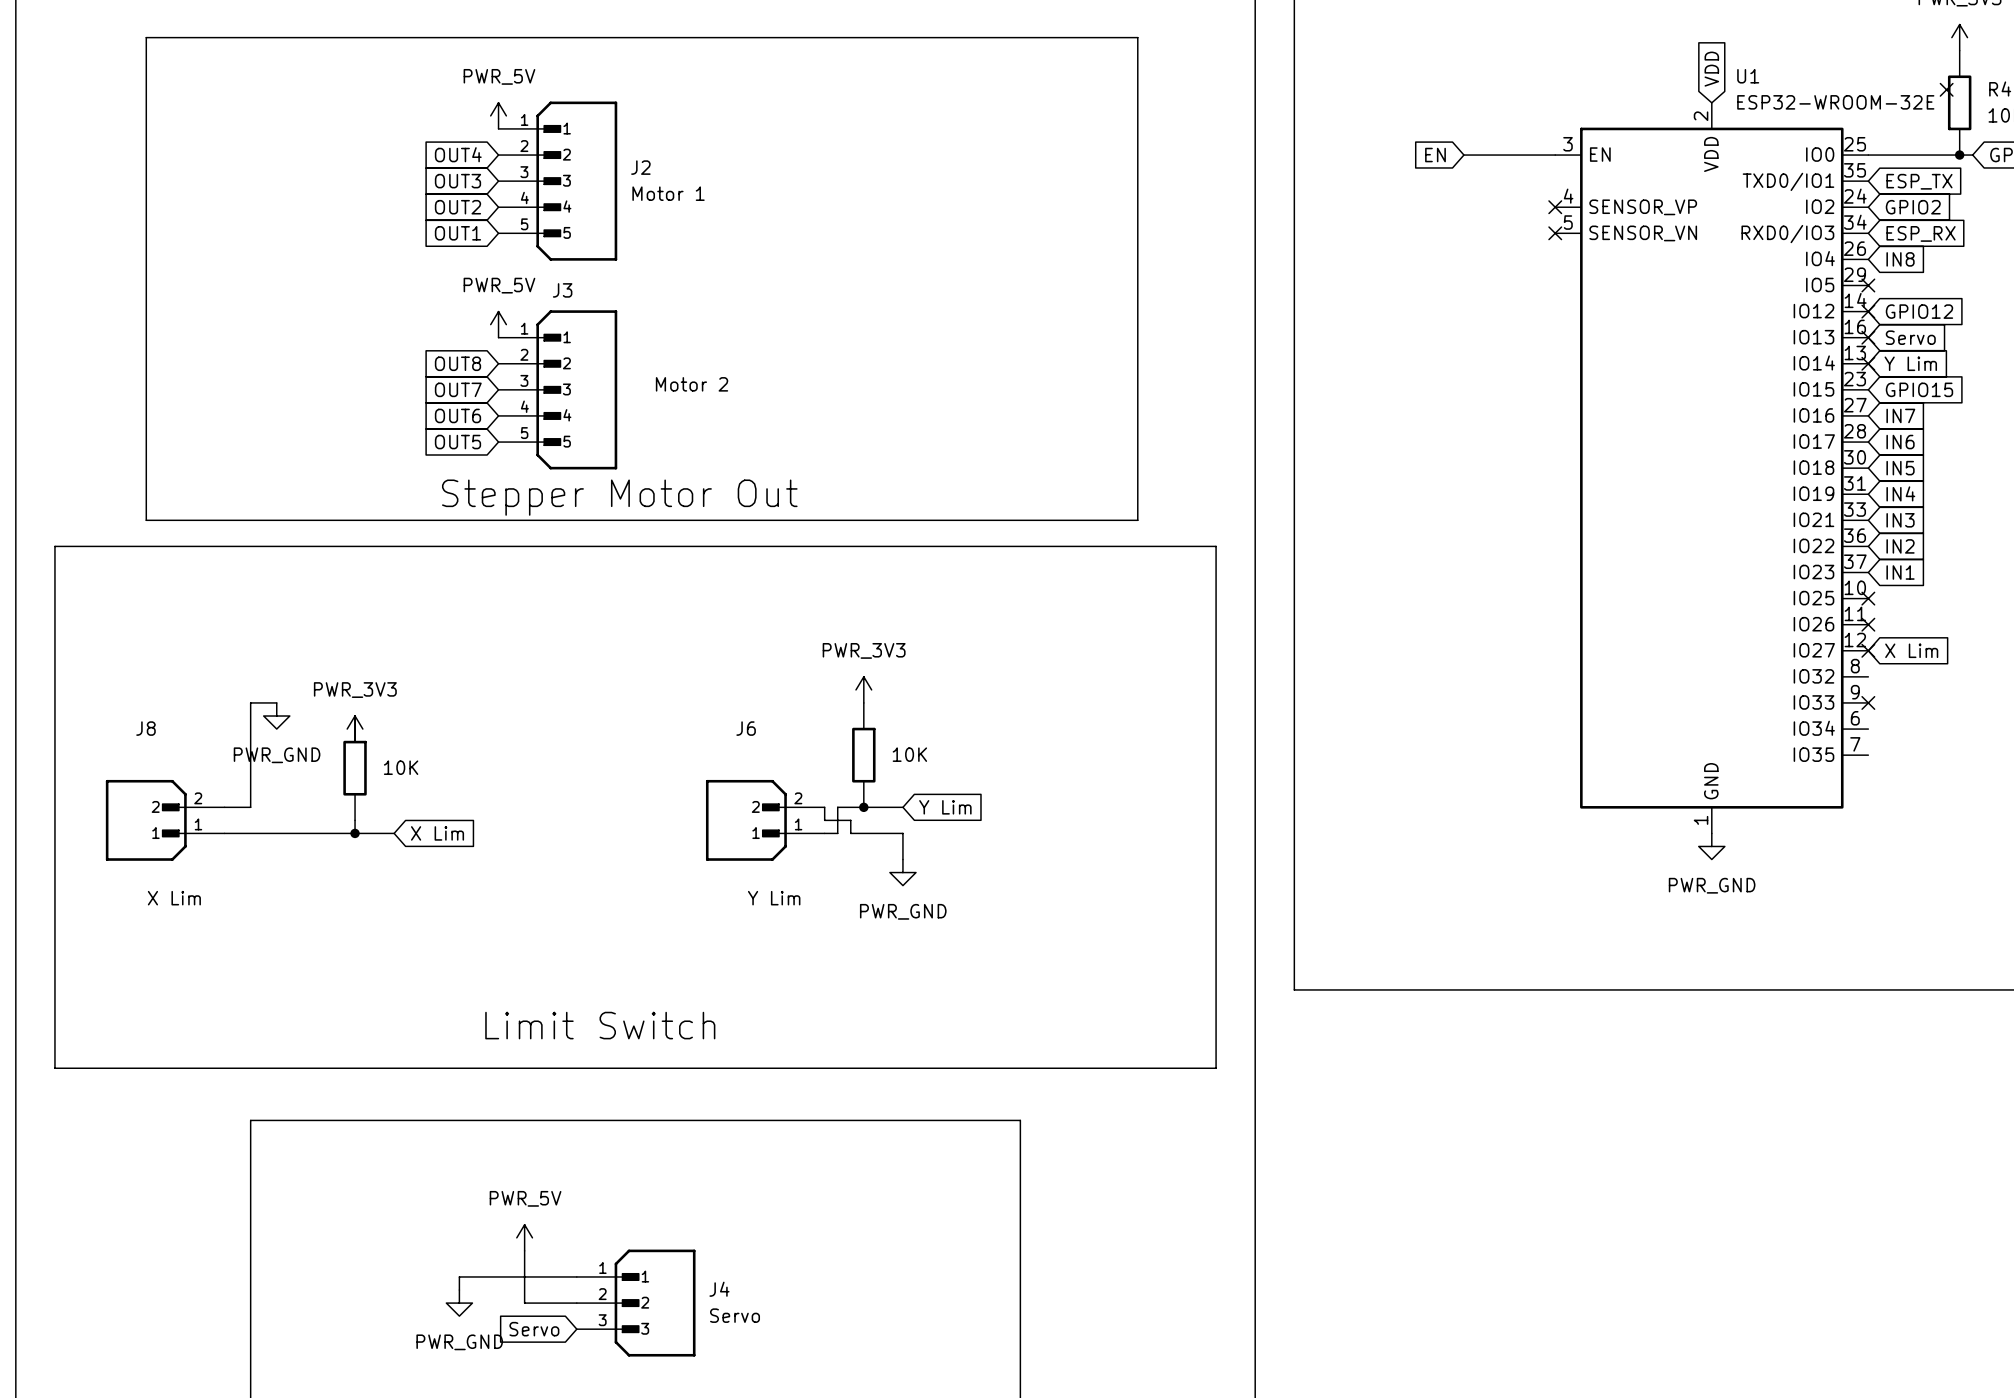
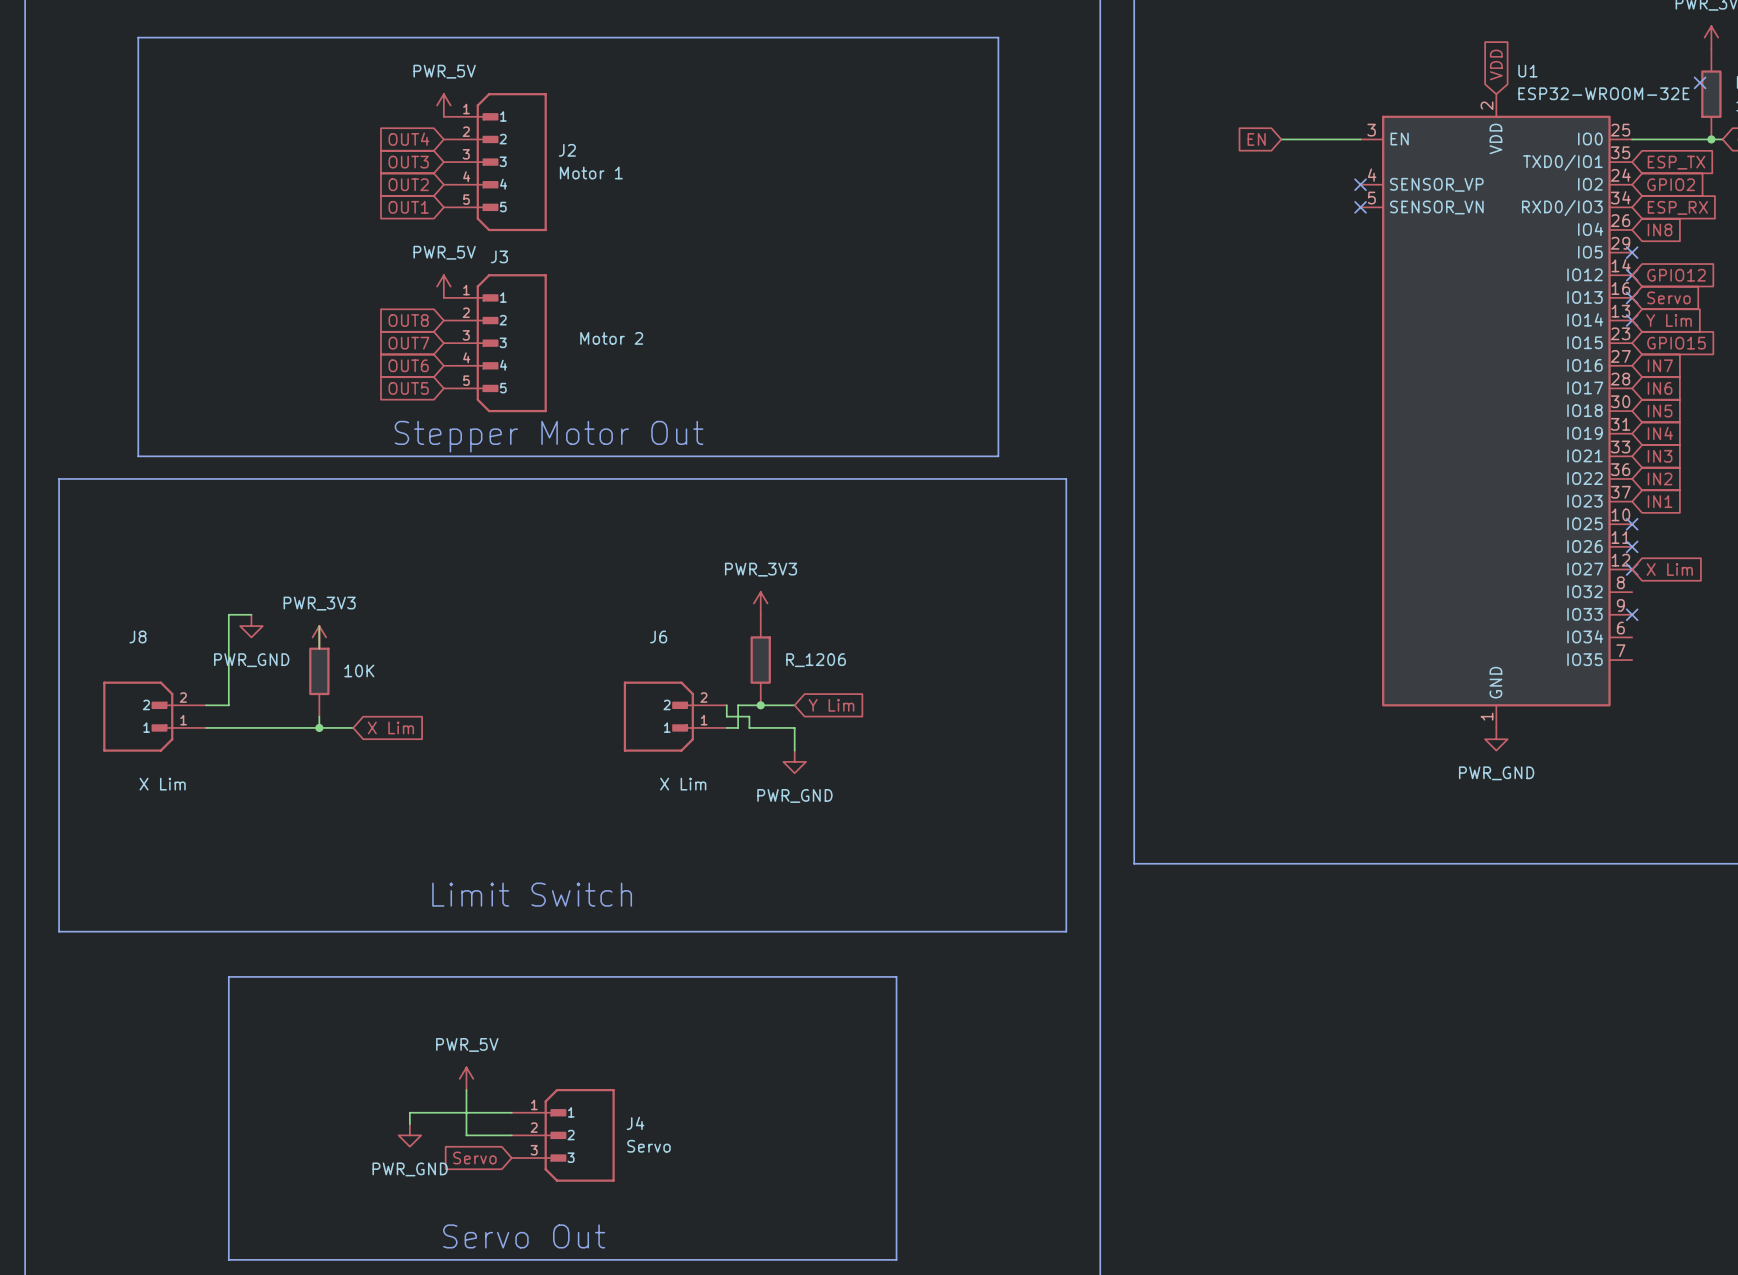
part value: 10K (909, 754) -> R_1206 (816, 660)
J6 value: Y Lim (774, 898) -> X Lim (683, 784)

